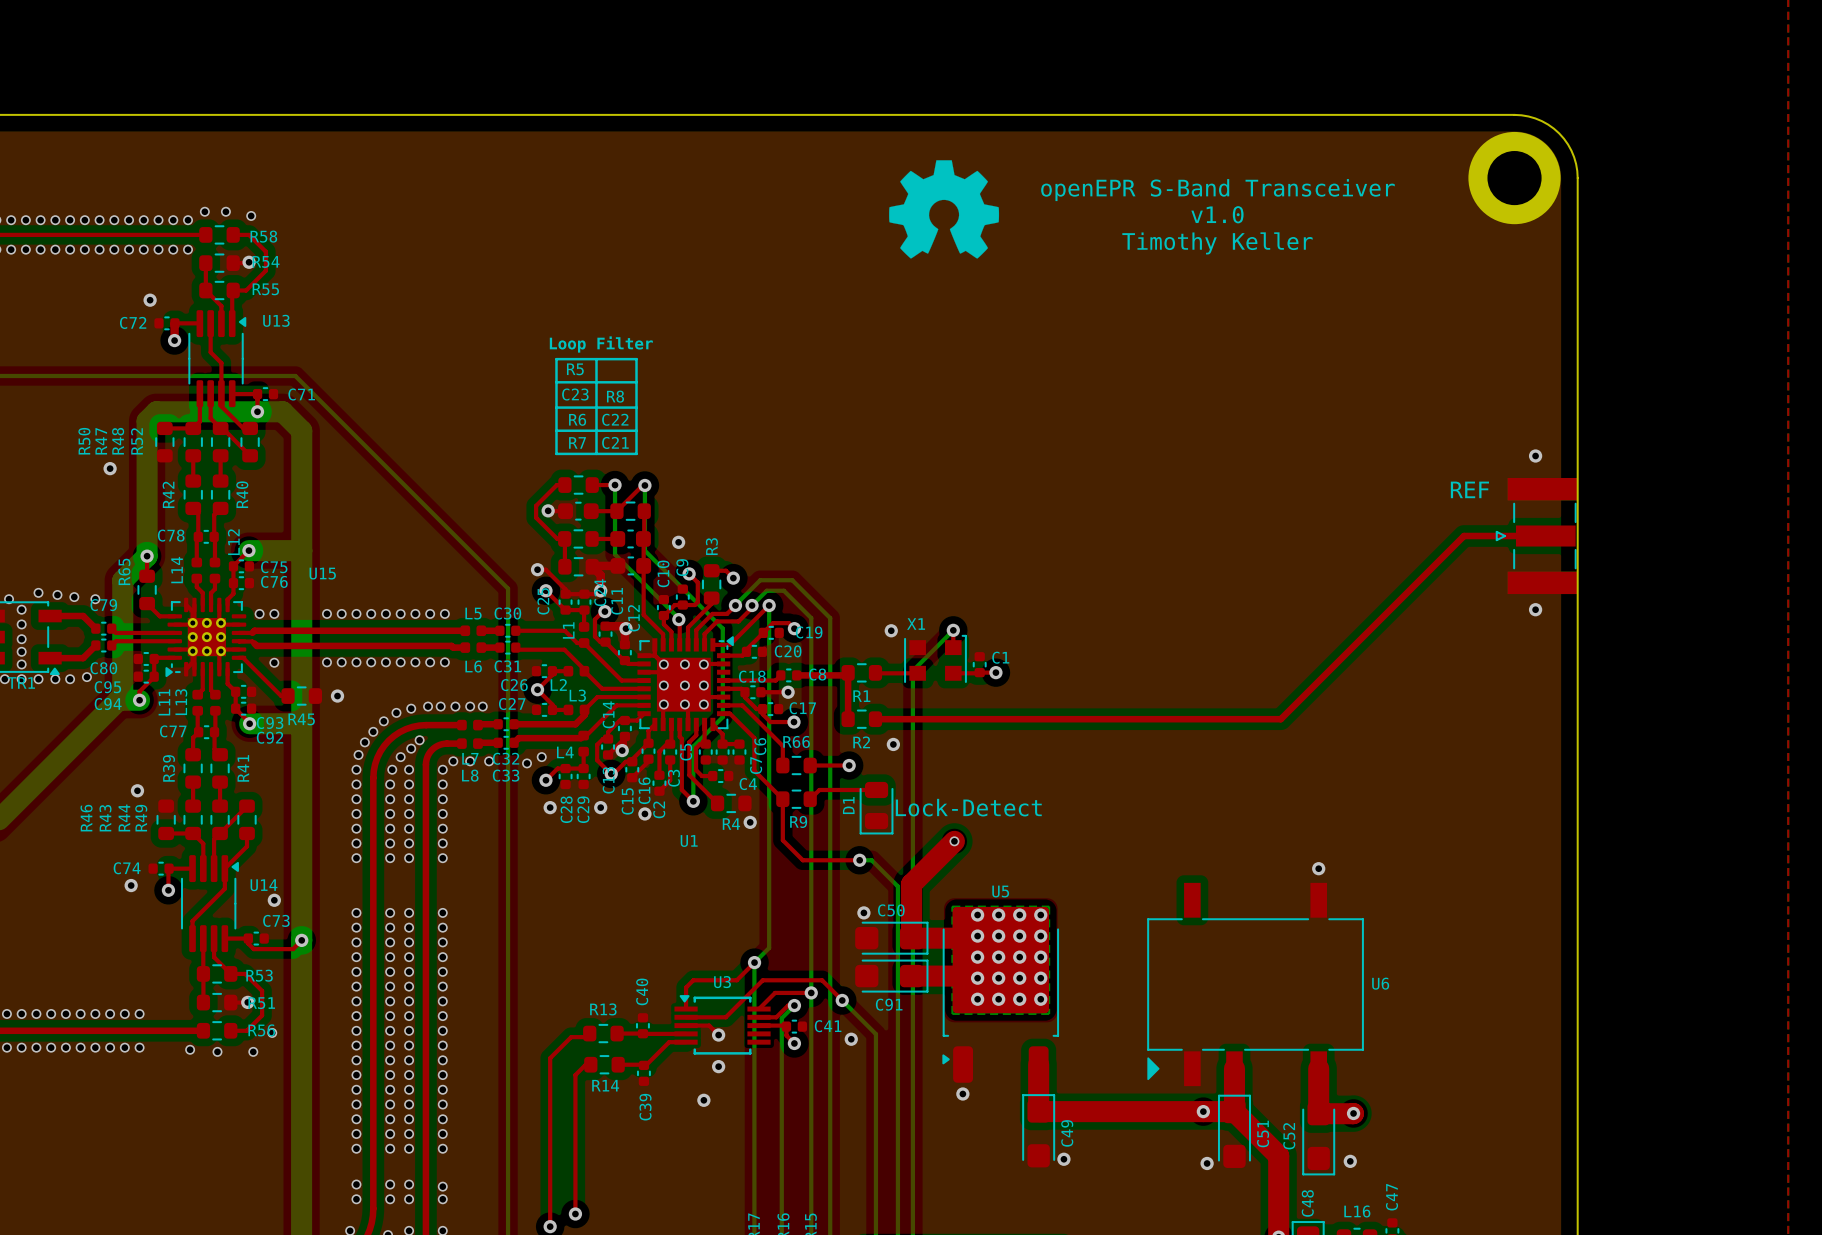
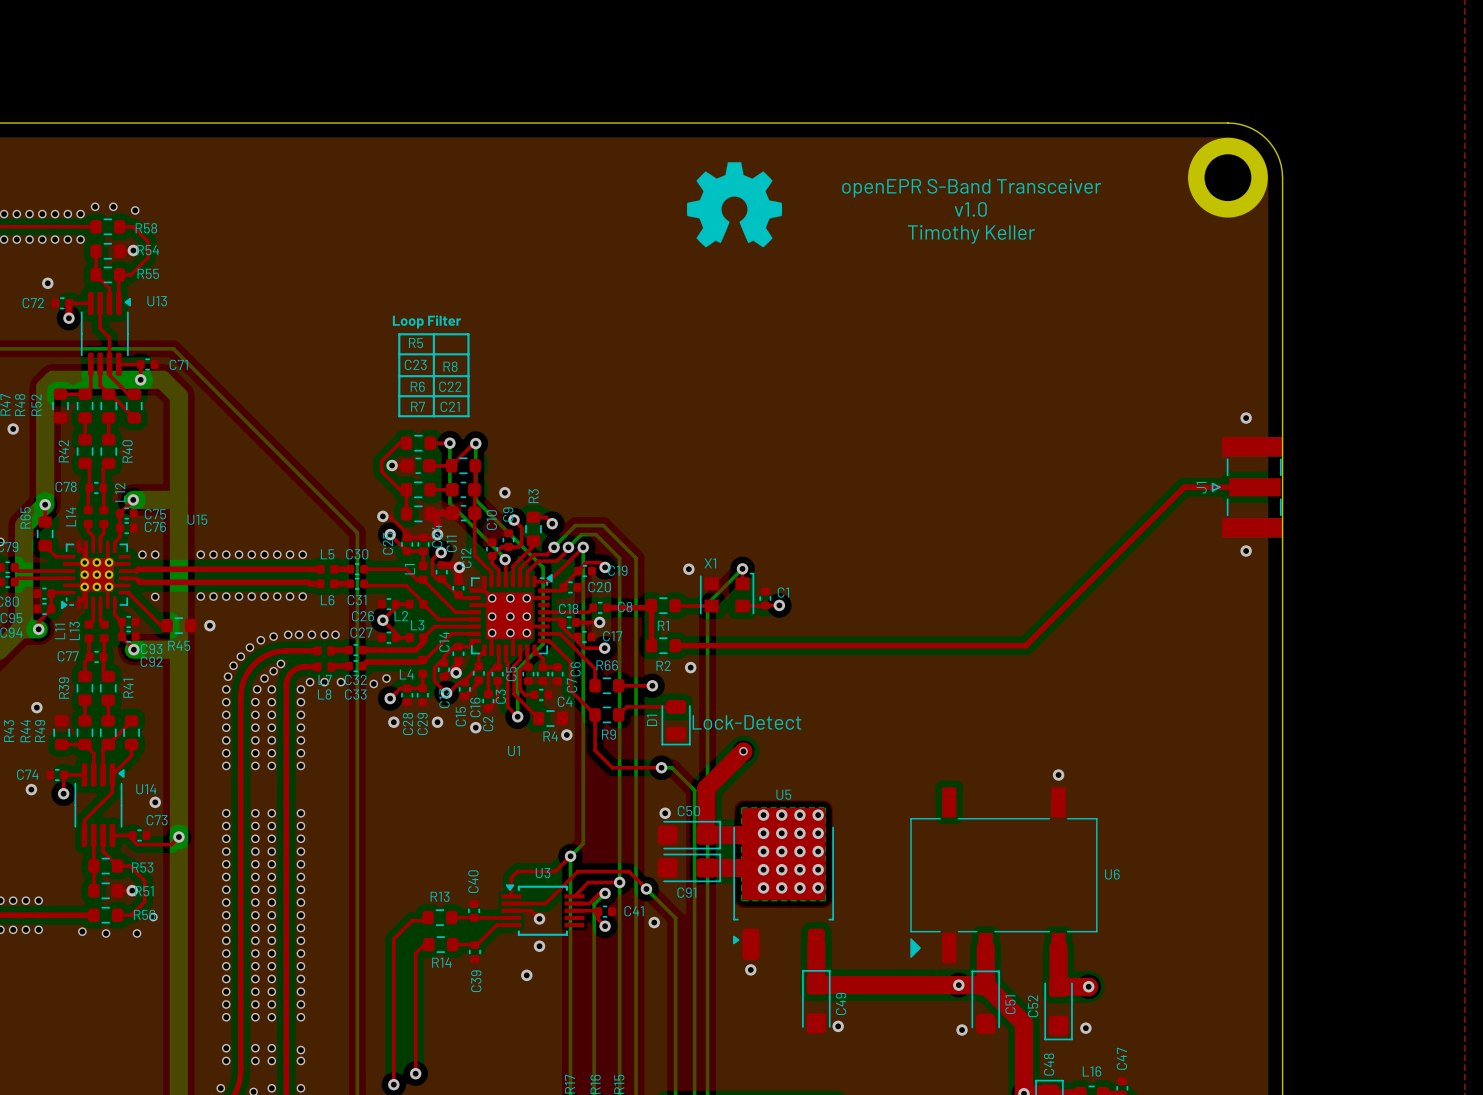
text: REF (1469, 489) -> none
J1 name: none -> J1 (1201, 487)

